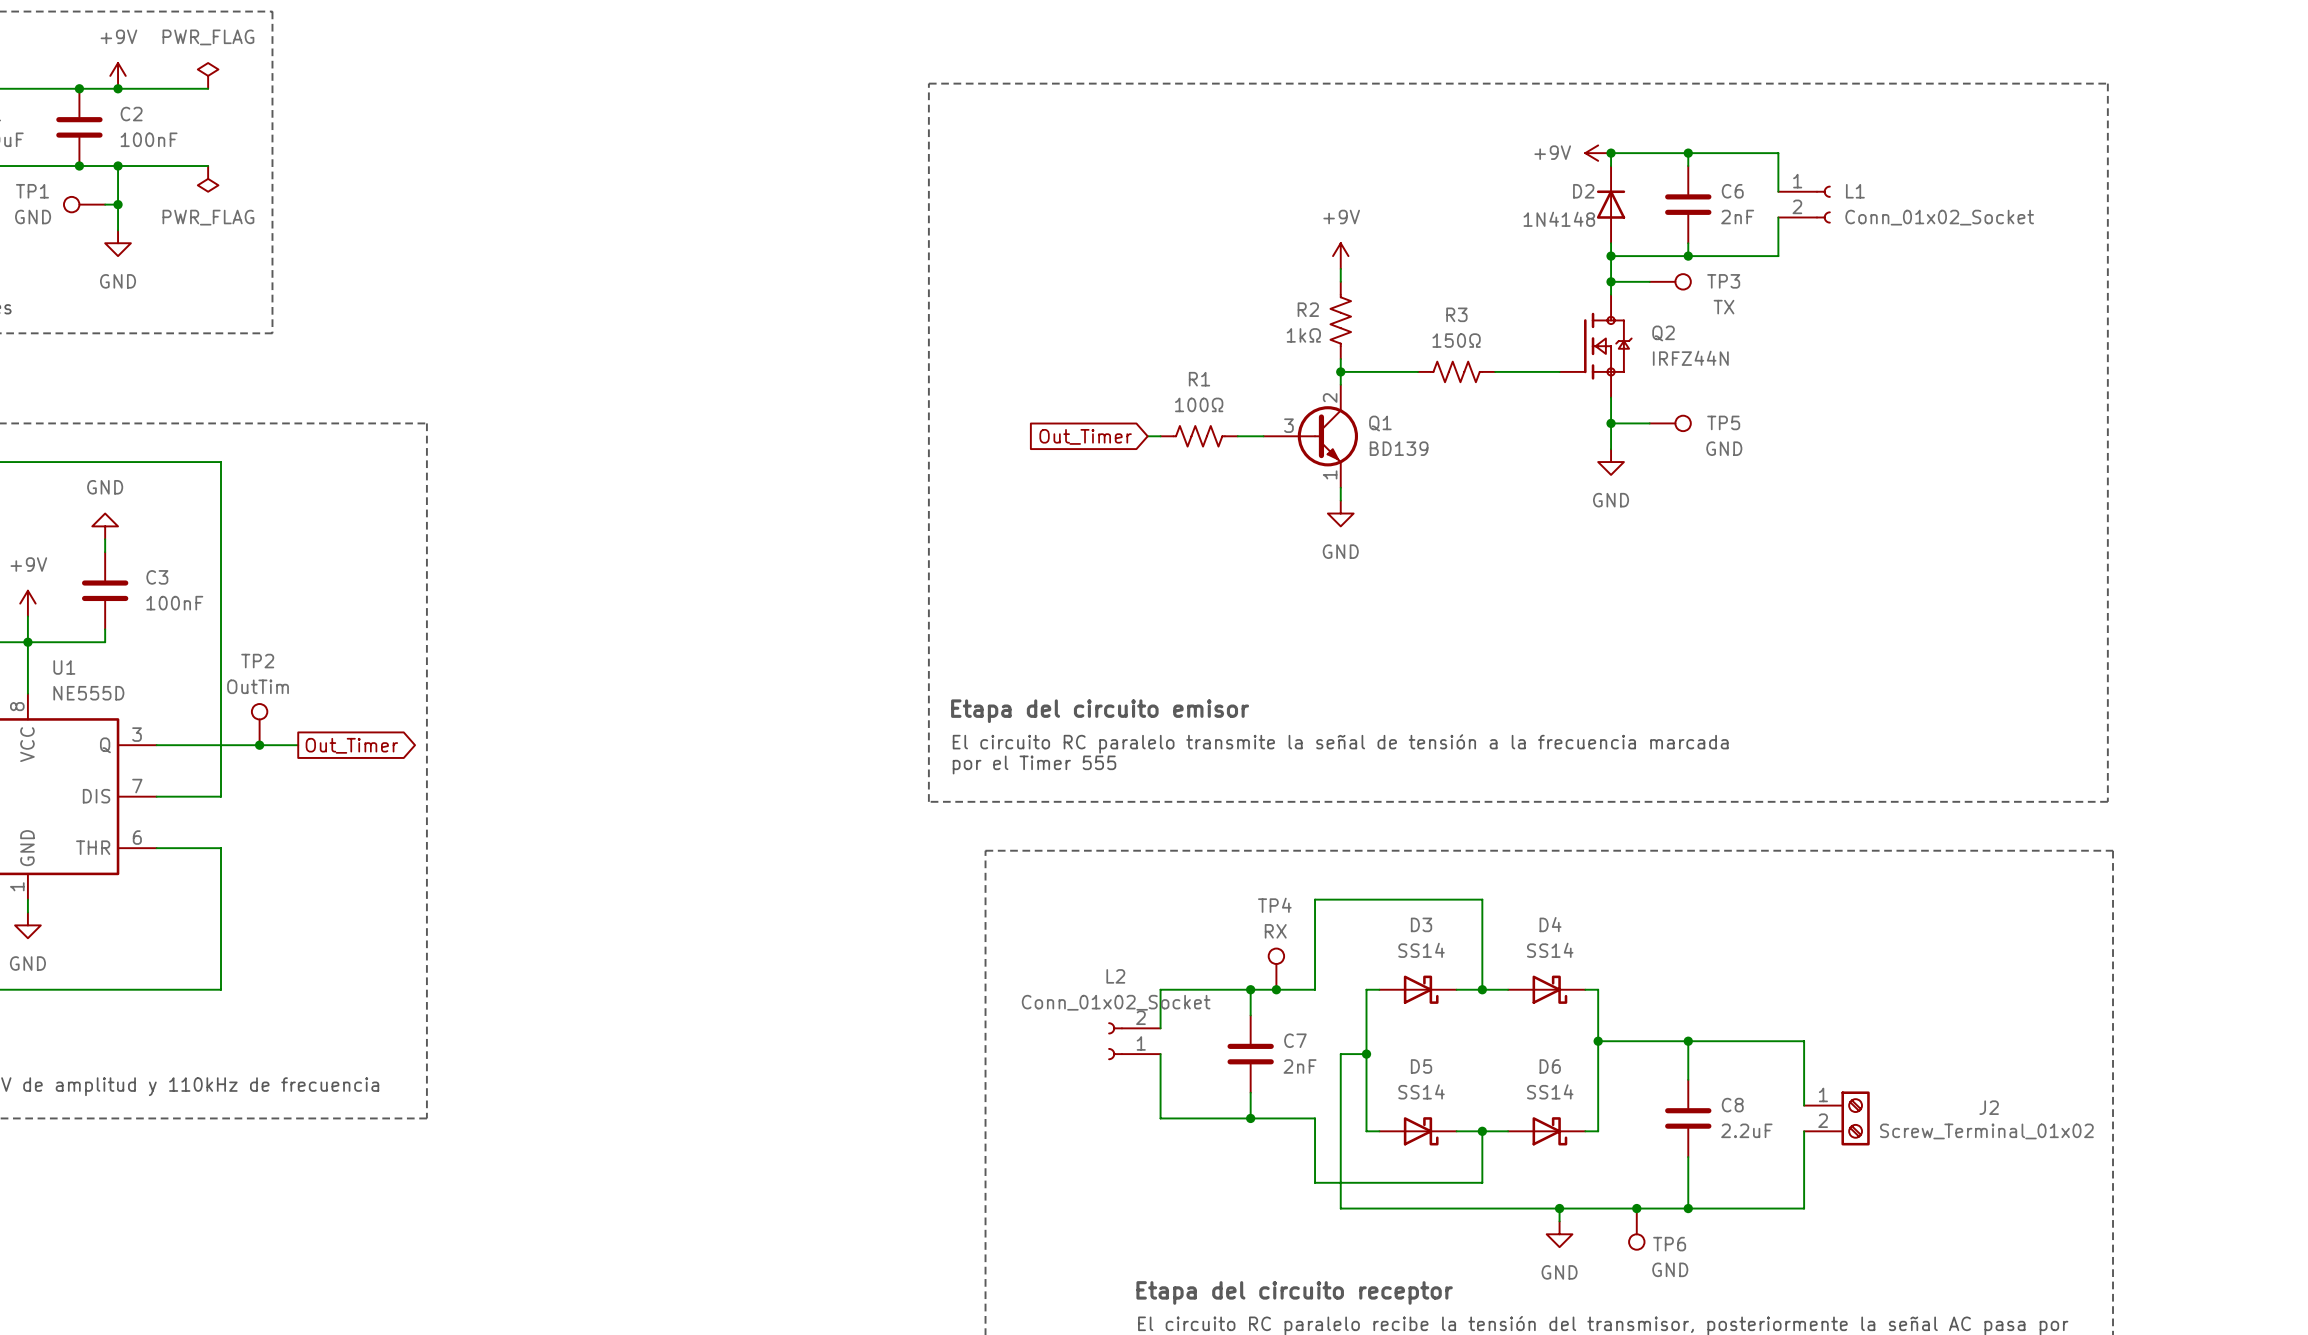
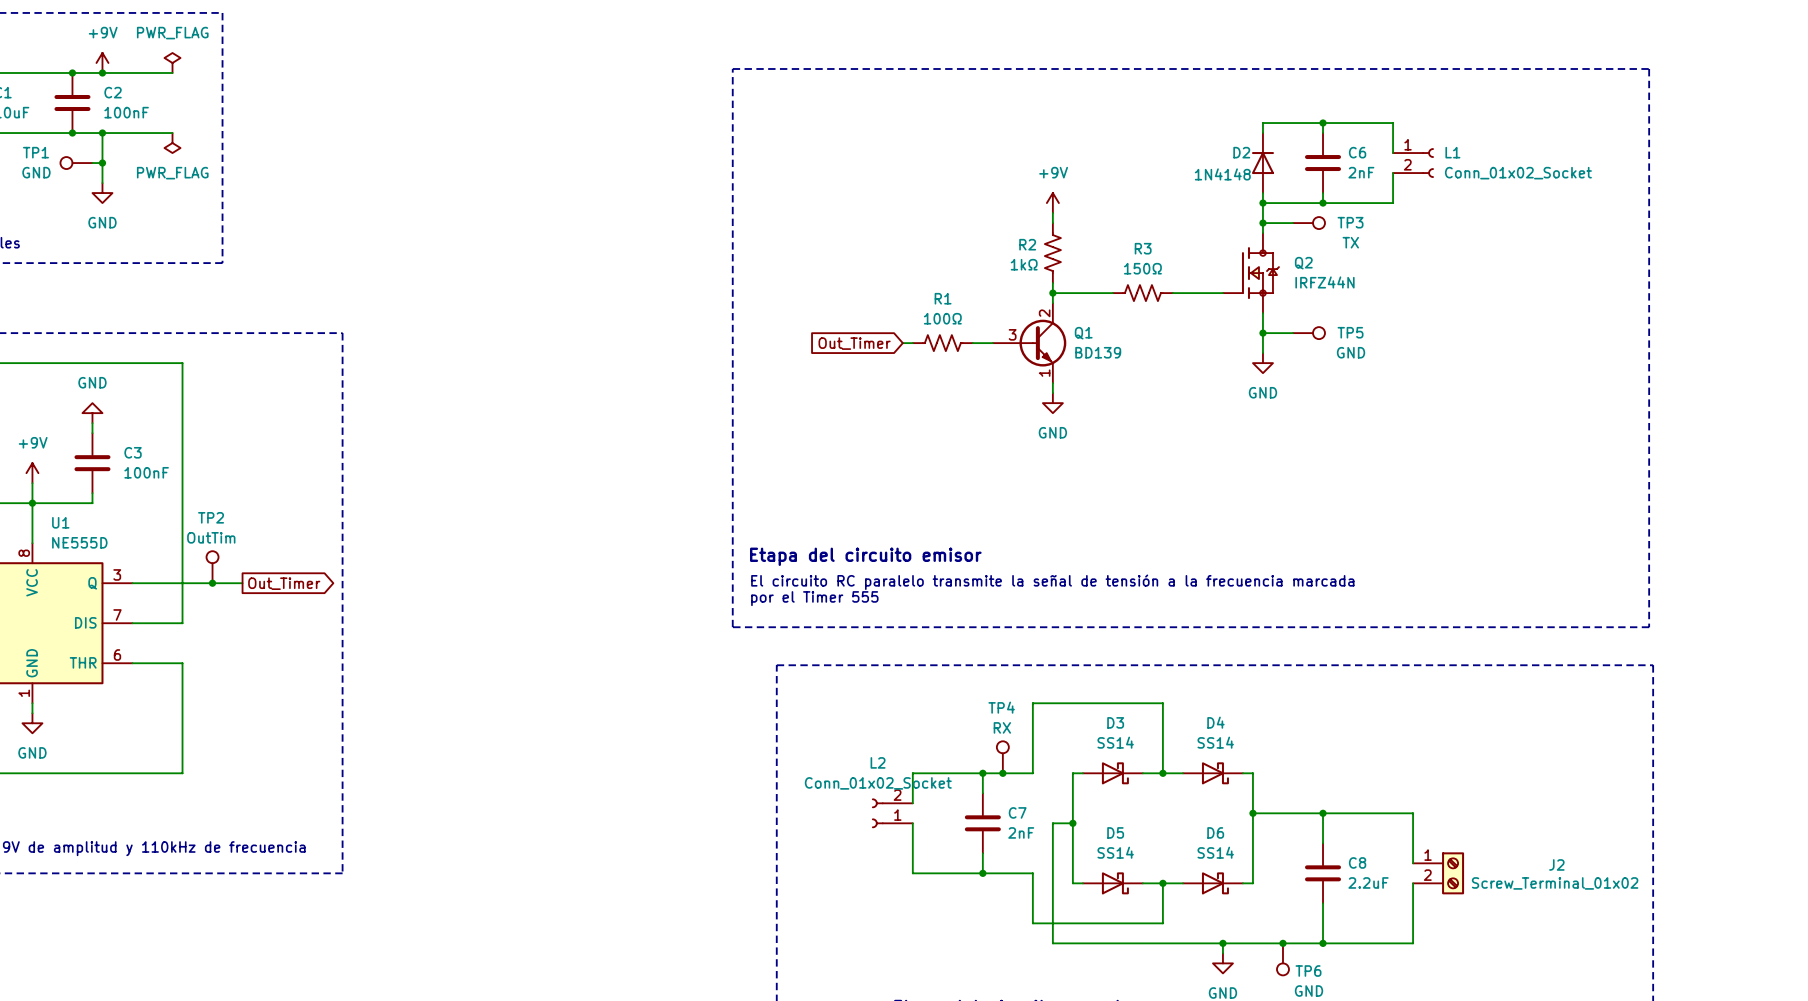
power symbol: +9V (1598, 153) -> none
junction: (1611, 153) -> none

